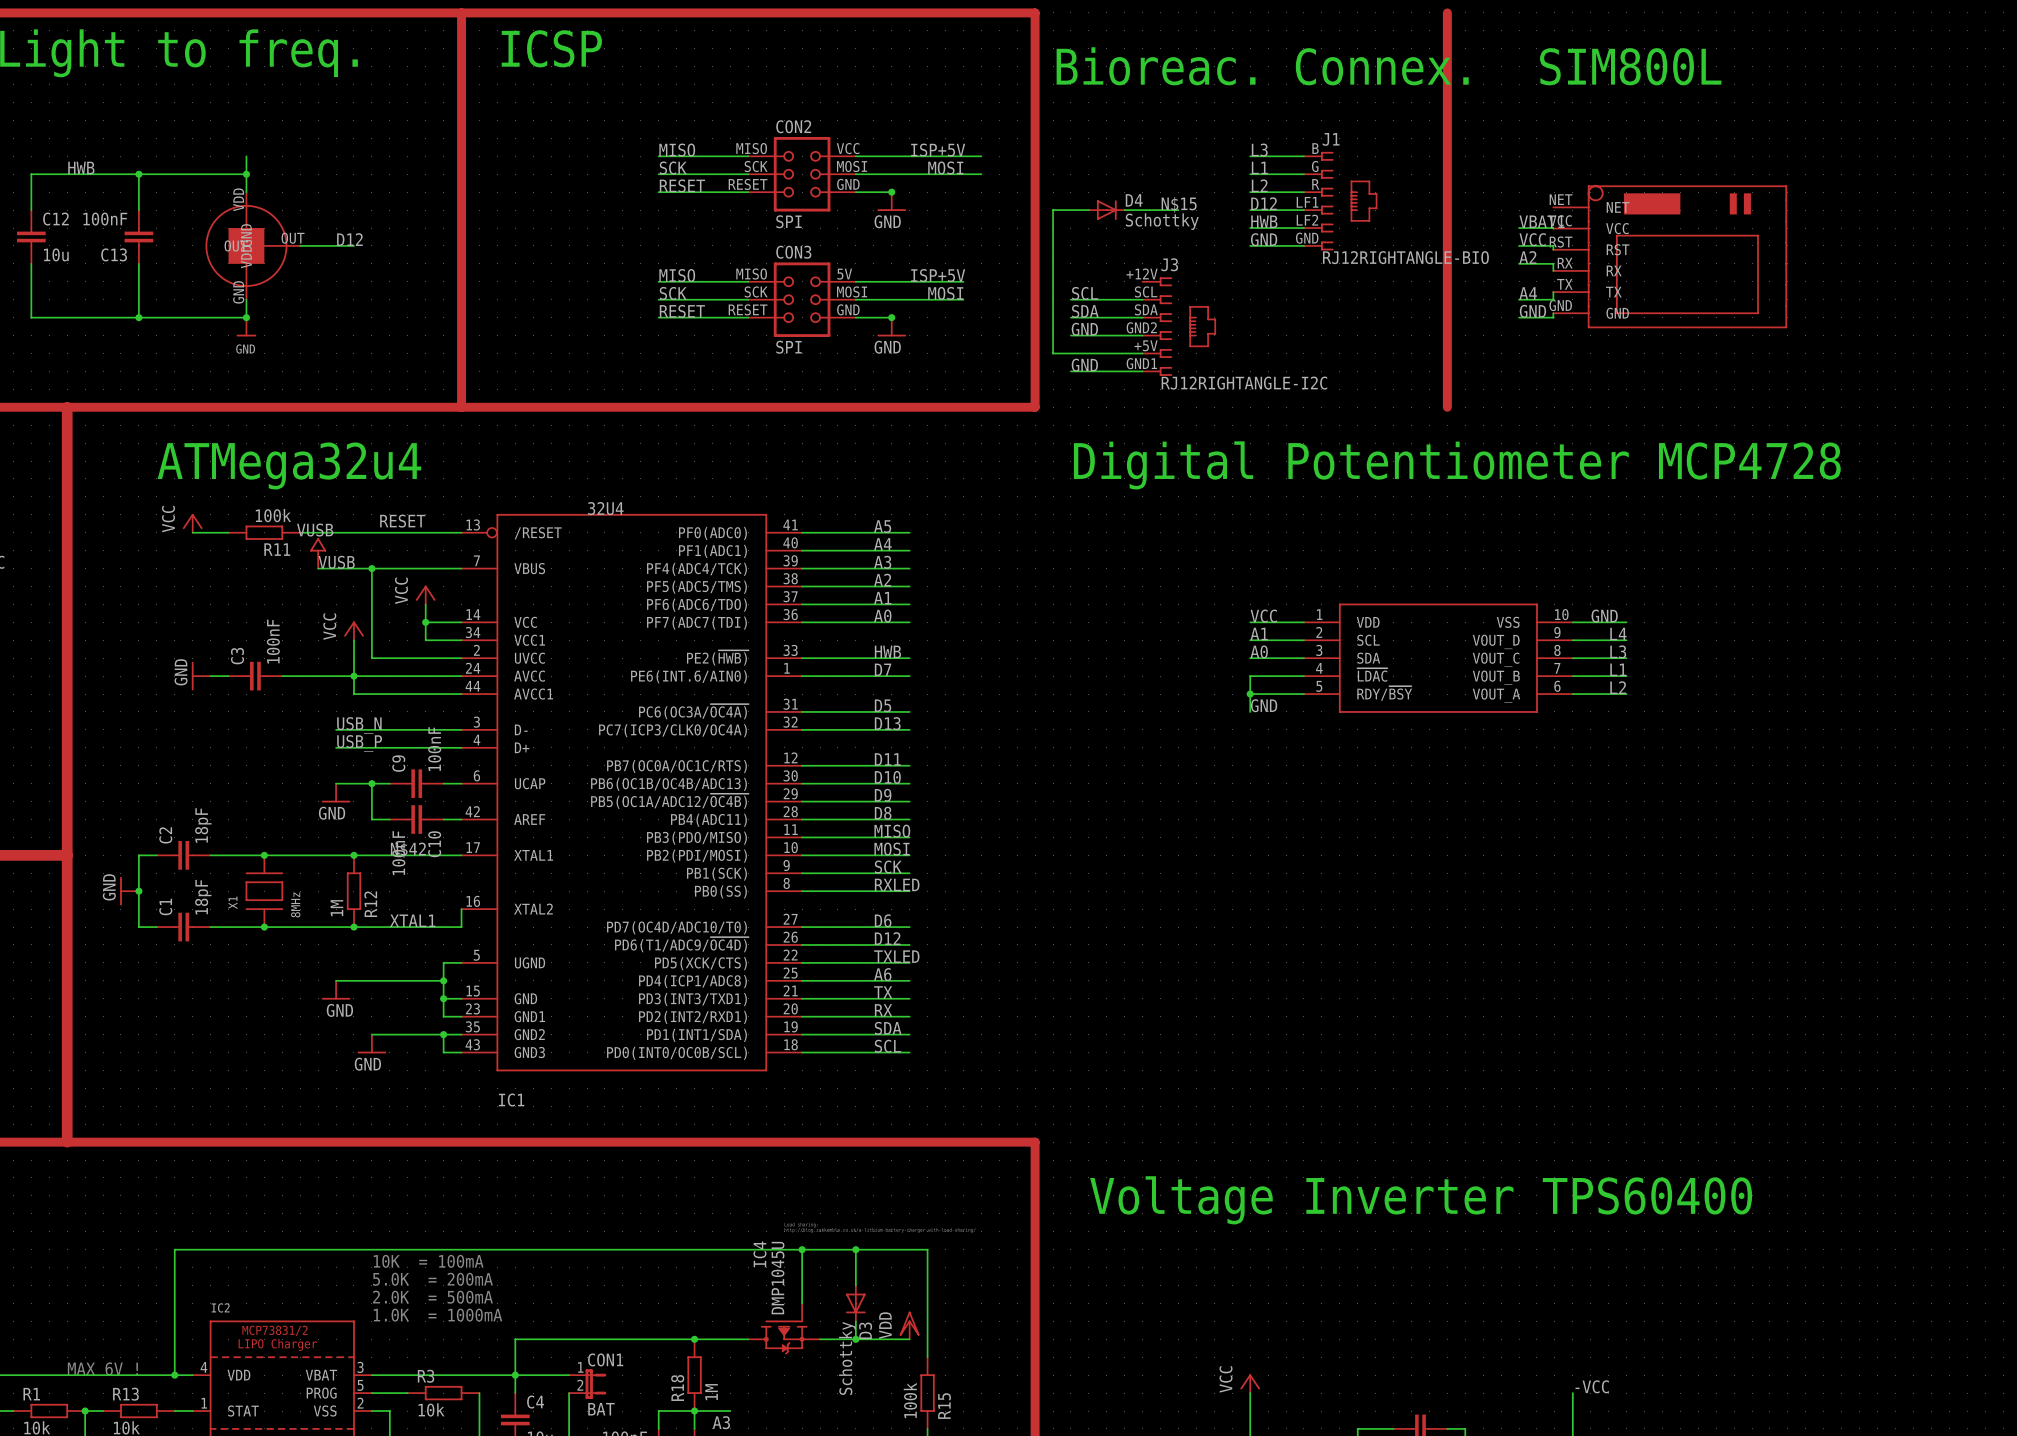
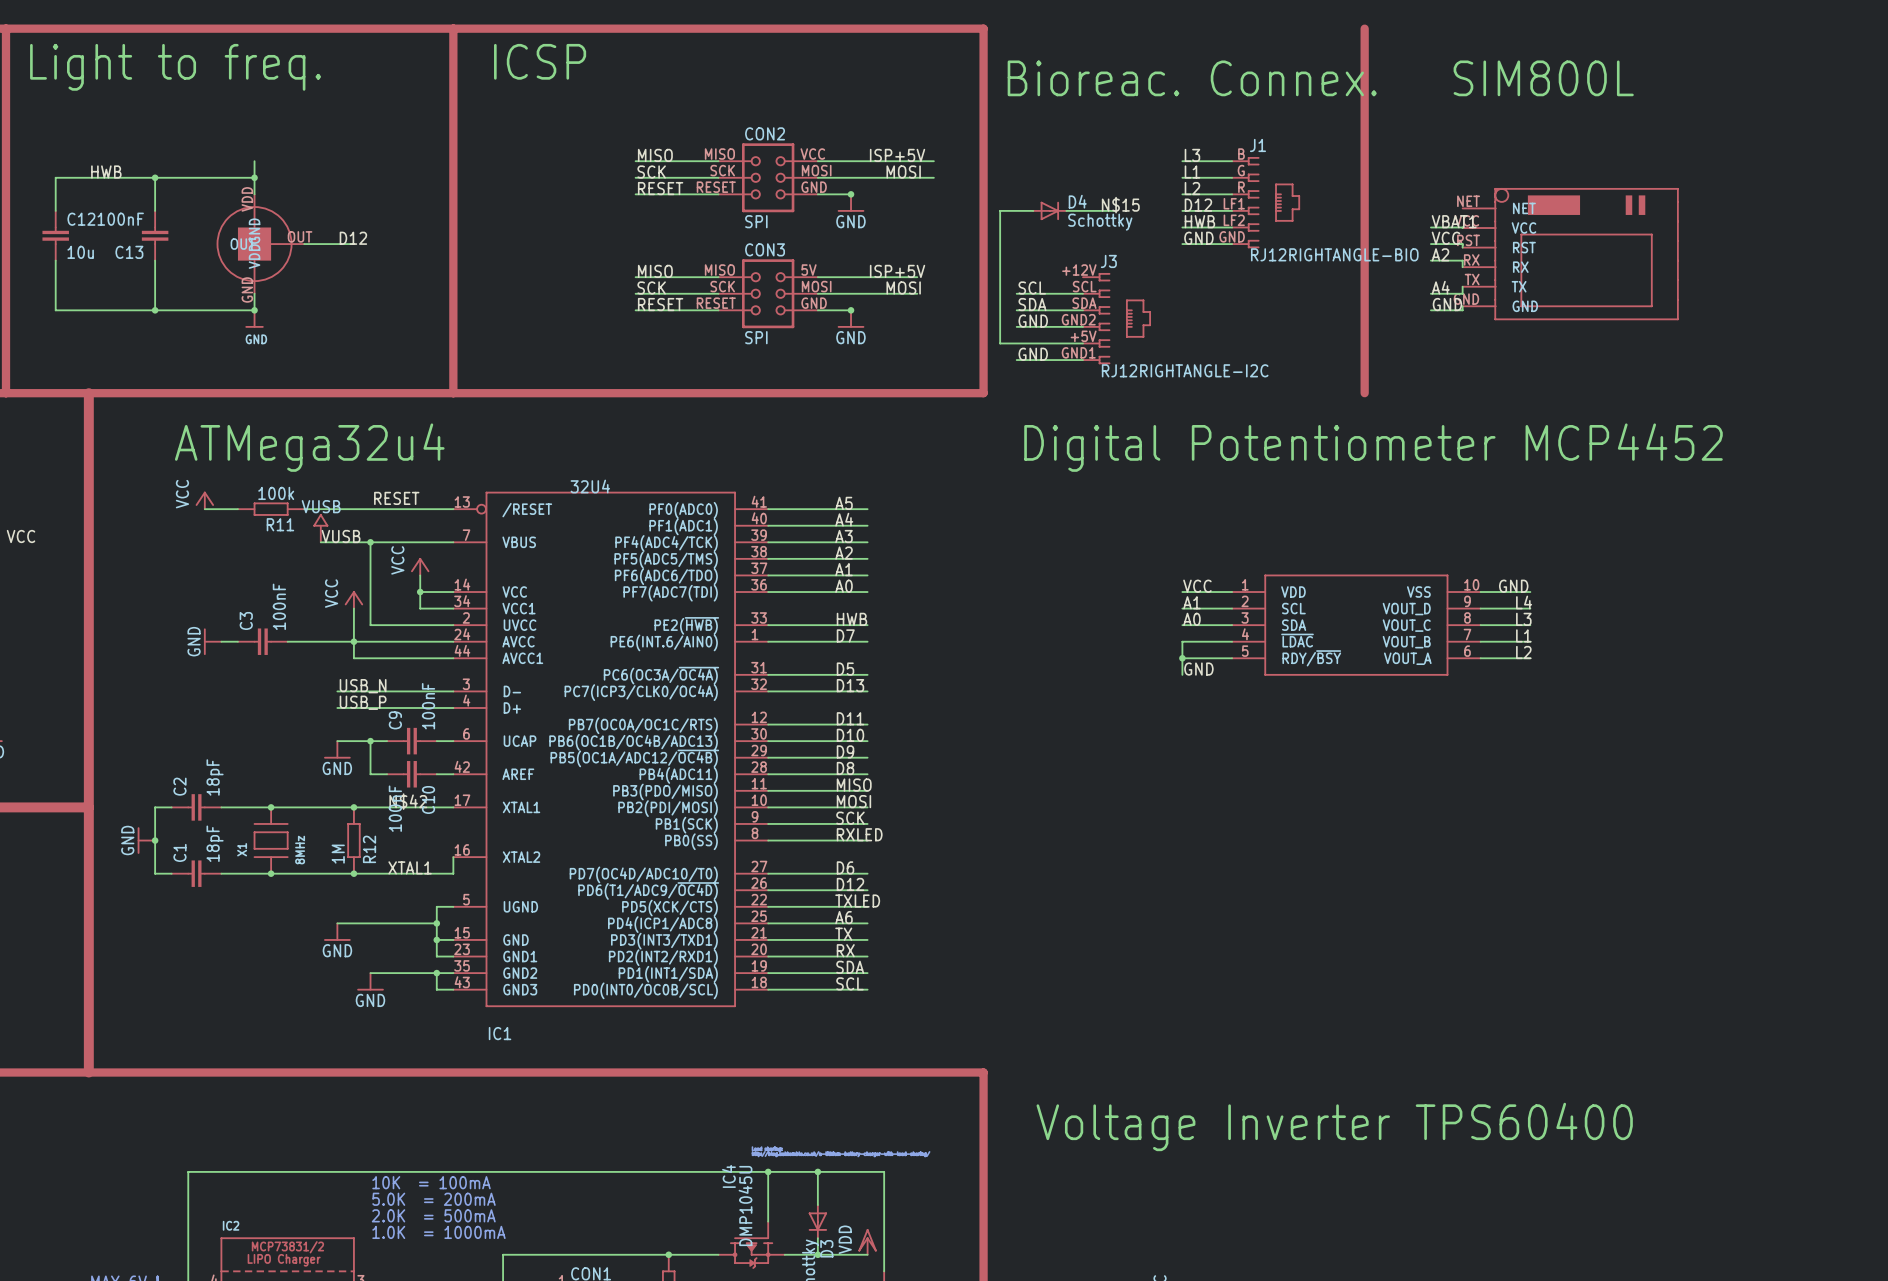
text: Digital Potentiometer MCP4728 (1457, 465) -> Digital Potentiometer MCP4452 (1373, 447)

